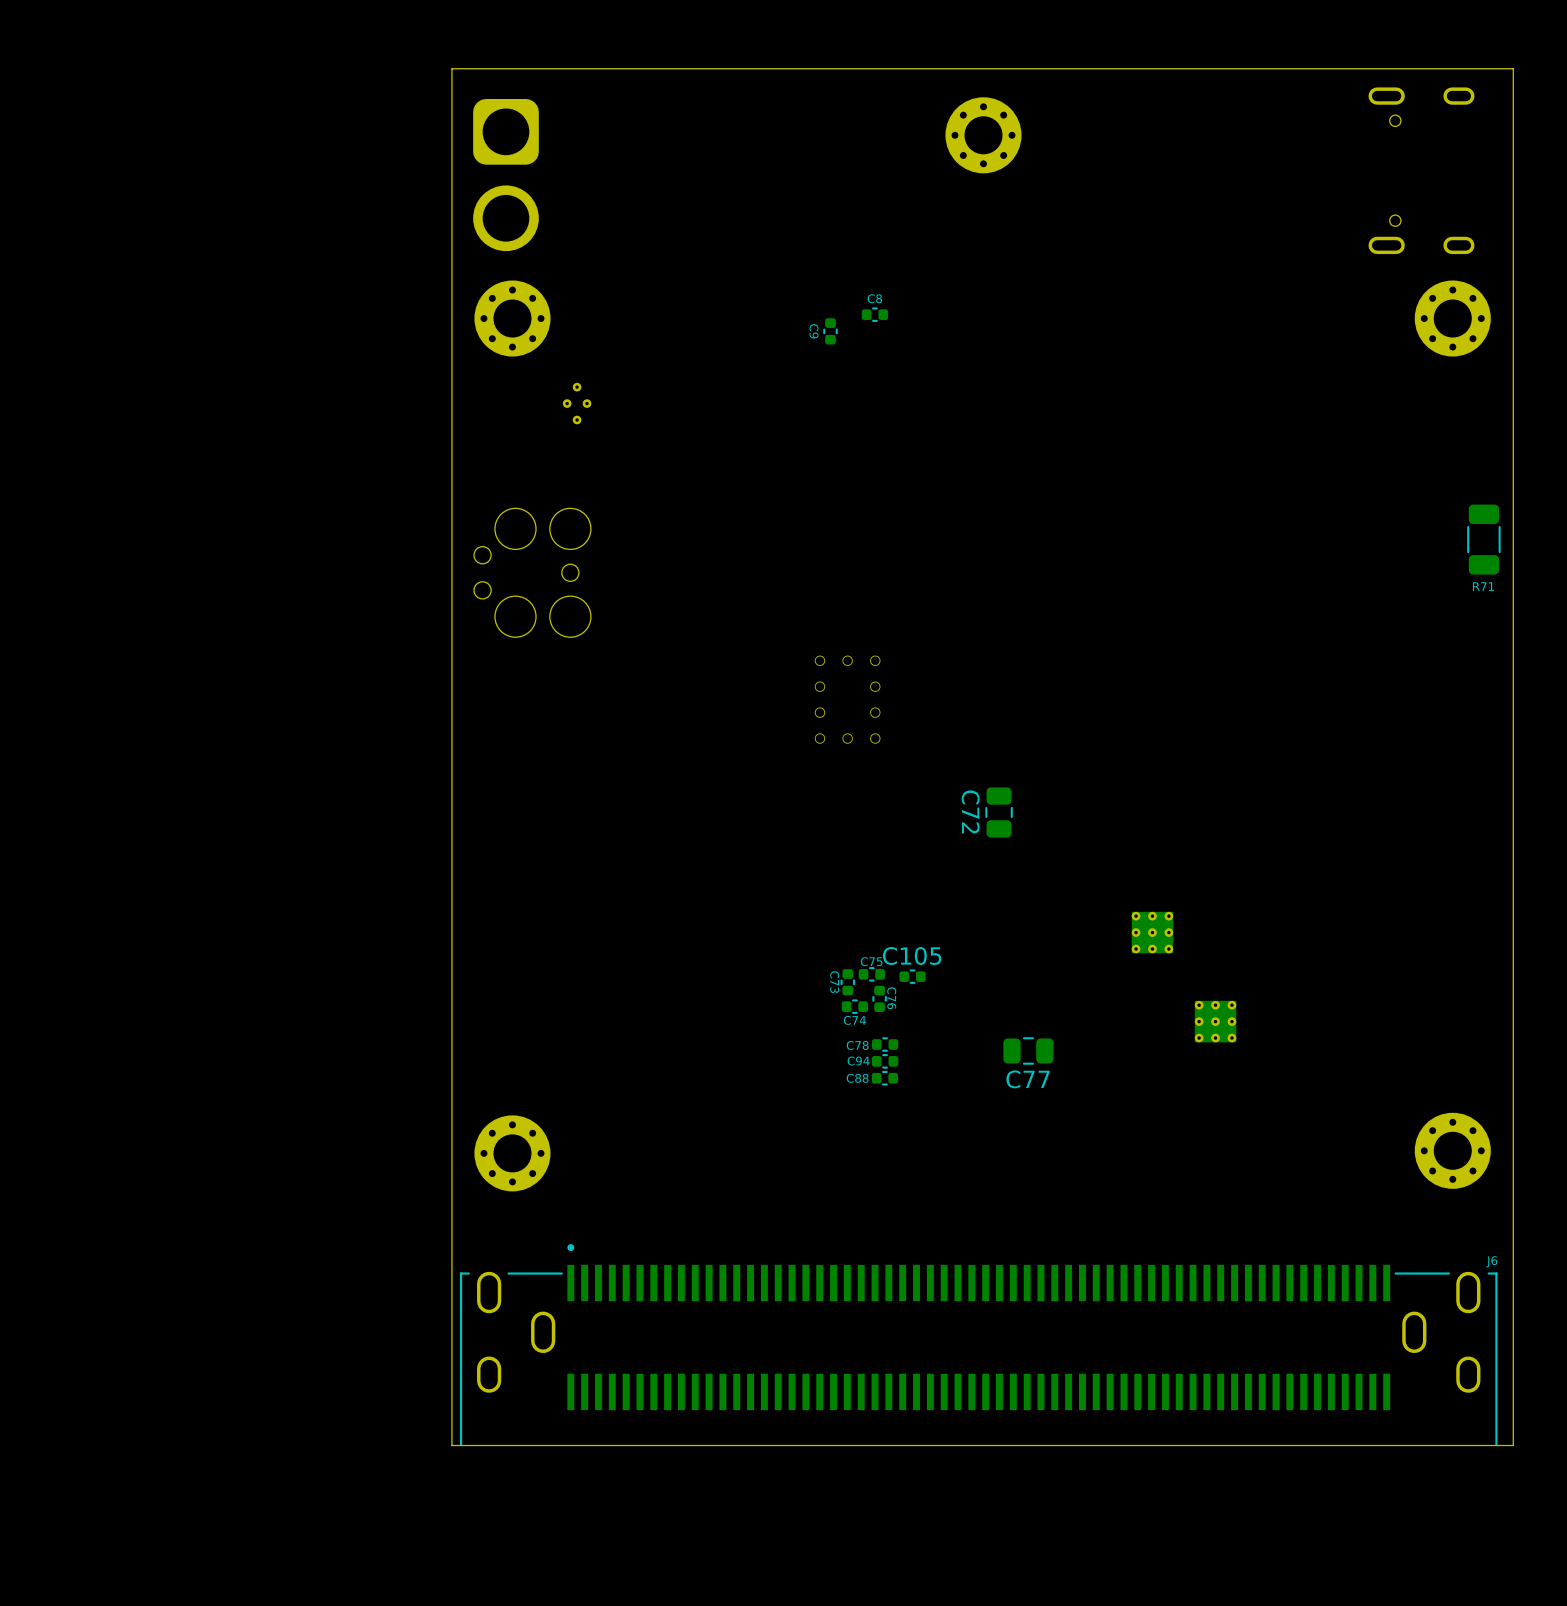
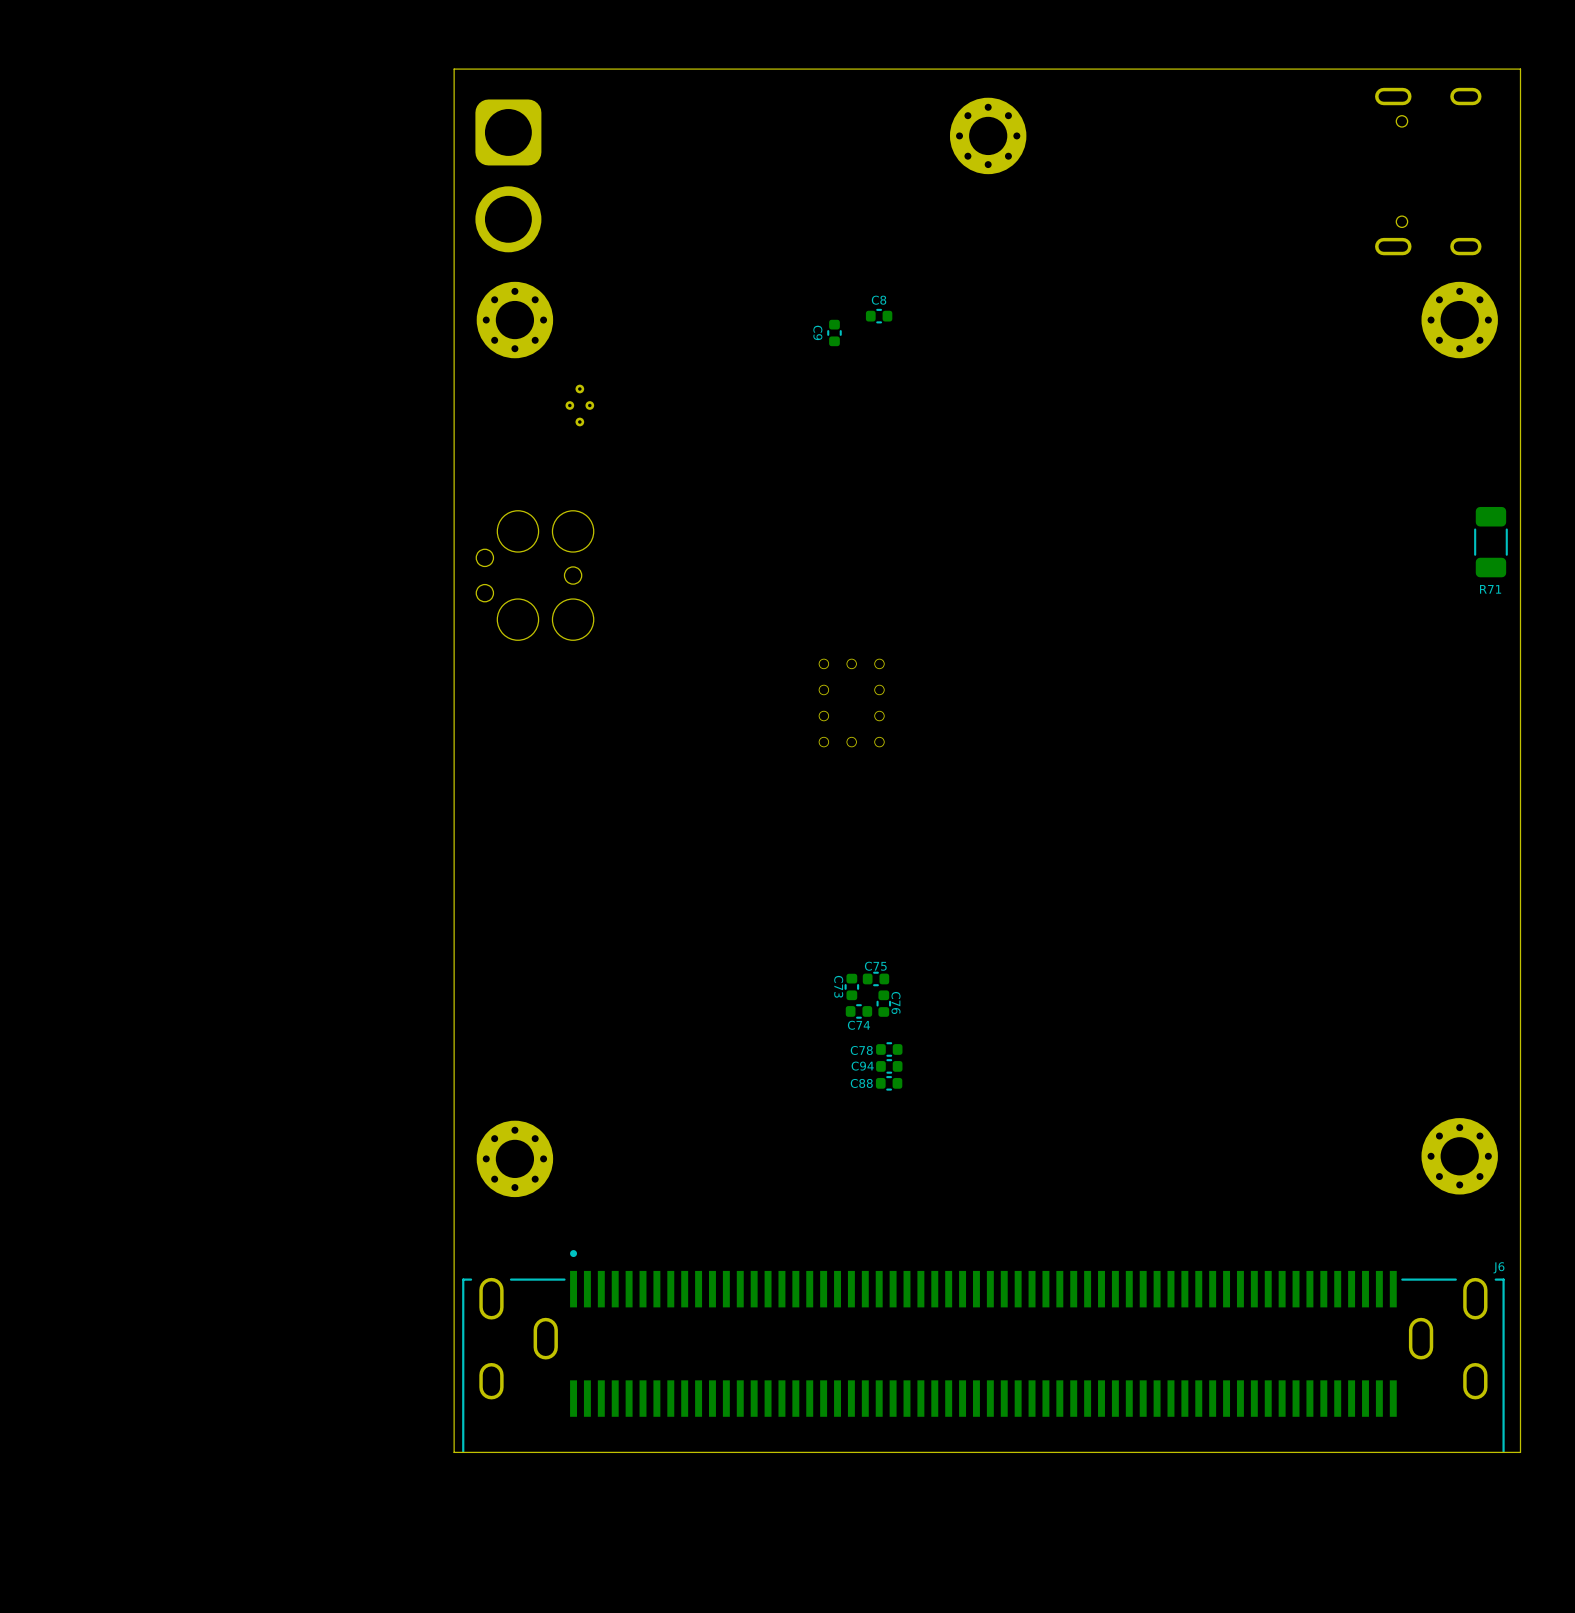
C72: (999, 812) -> none
part: (1152, 932) -> none
C105: (912, 976) -> none
part: (1215, 1021) -> none
C77: (1028, 1050) -> none

